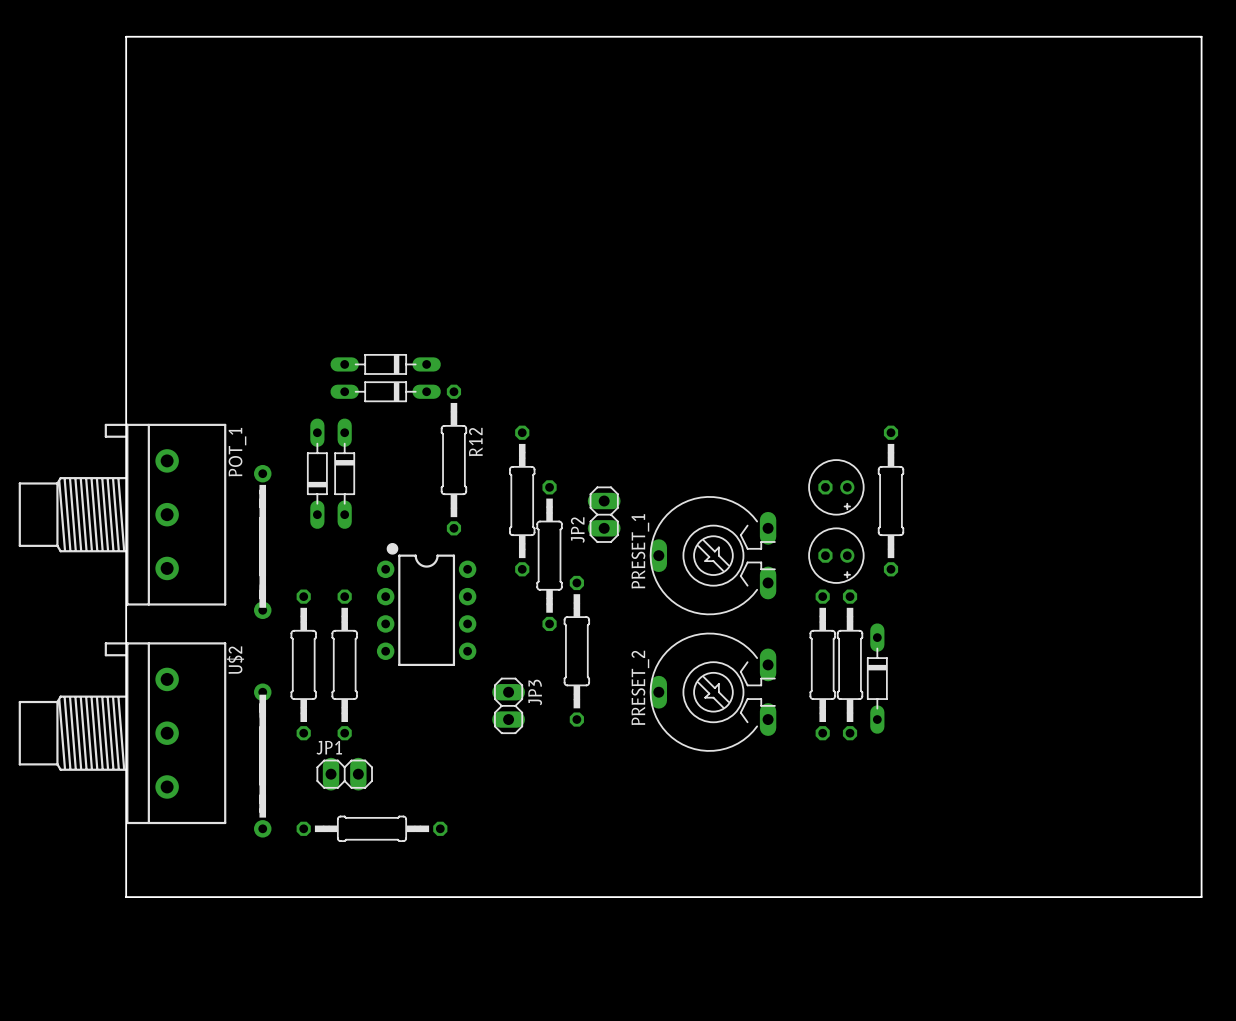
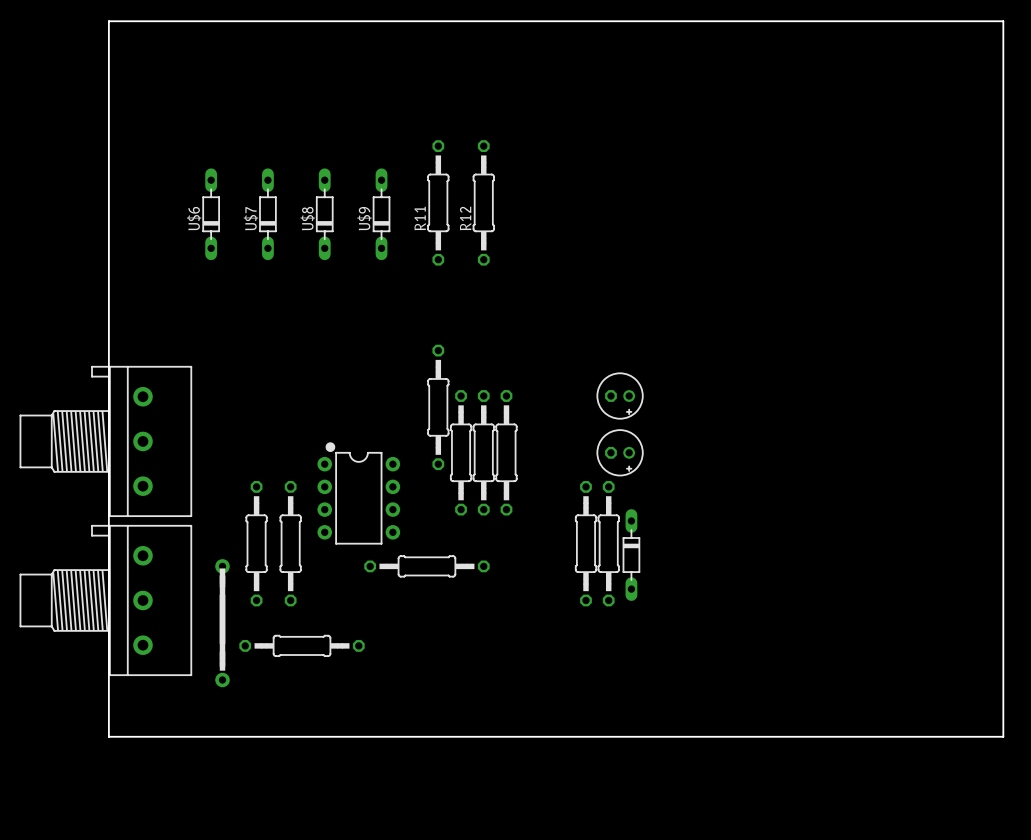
R11: none -> (438, 202)
U$6: none -> (211, 214)
U$7: none -> (267, 214)
U$8: none -> (324, 214)
U$9: none -> (381, 214)
part: (385, 364) -> none
part: (385, 391) -> none
R12 name position: R12 (475, 442) -> R12 (465, 218)
R12 position: (453, 460) -> (483, 202)
part: (317, 473) -> none
part: (344, 473) -> none
part: none -> (620, 396)
part: (836, 487) -> none
part: (891, 501) -> none
POT_1: (122, 514) -> none
JP2: (604, 514) -> none
part: none -> (105, 441)
part: (262, 541) -> none
part: none -> (483, 452)
part: none -> (506, 452)
PRESET_1: (713, 555) -> none
part: none -> (620, 452)
part: (836, 555) -> none
part: (576, 651) -> none
U$2 name: U$2 (235, 660) -> none
part: none -> (585, 543)
part: none -> (608, 543)
part: (822, 664) -> none
part: (850, 664) -> none
part position: (877, 678) -> (631, 555)
part: none -> (426, 566)
PRESET_2: (713, 692) -> none
JP3: (508, 705) -> none
JP1: (344, 774) -> none
part position: (372, 828) -> (302, 645)

